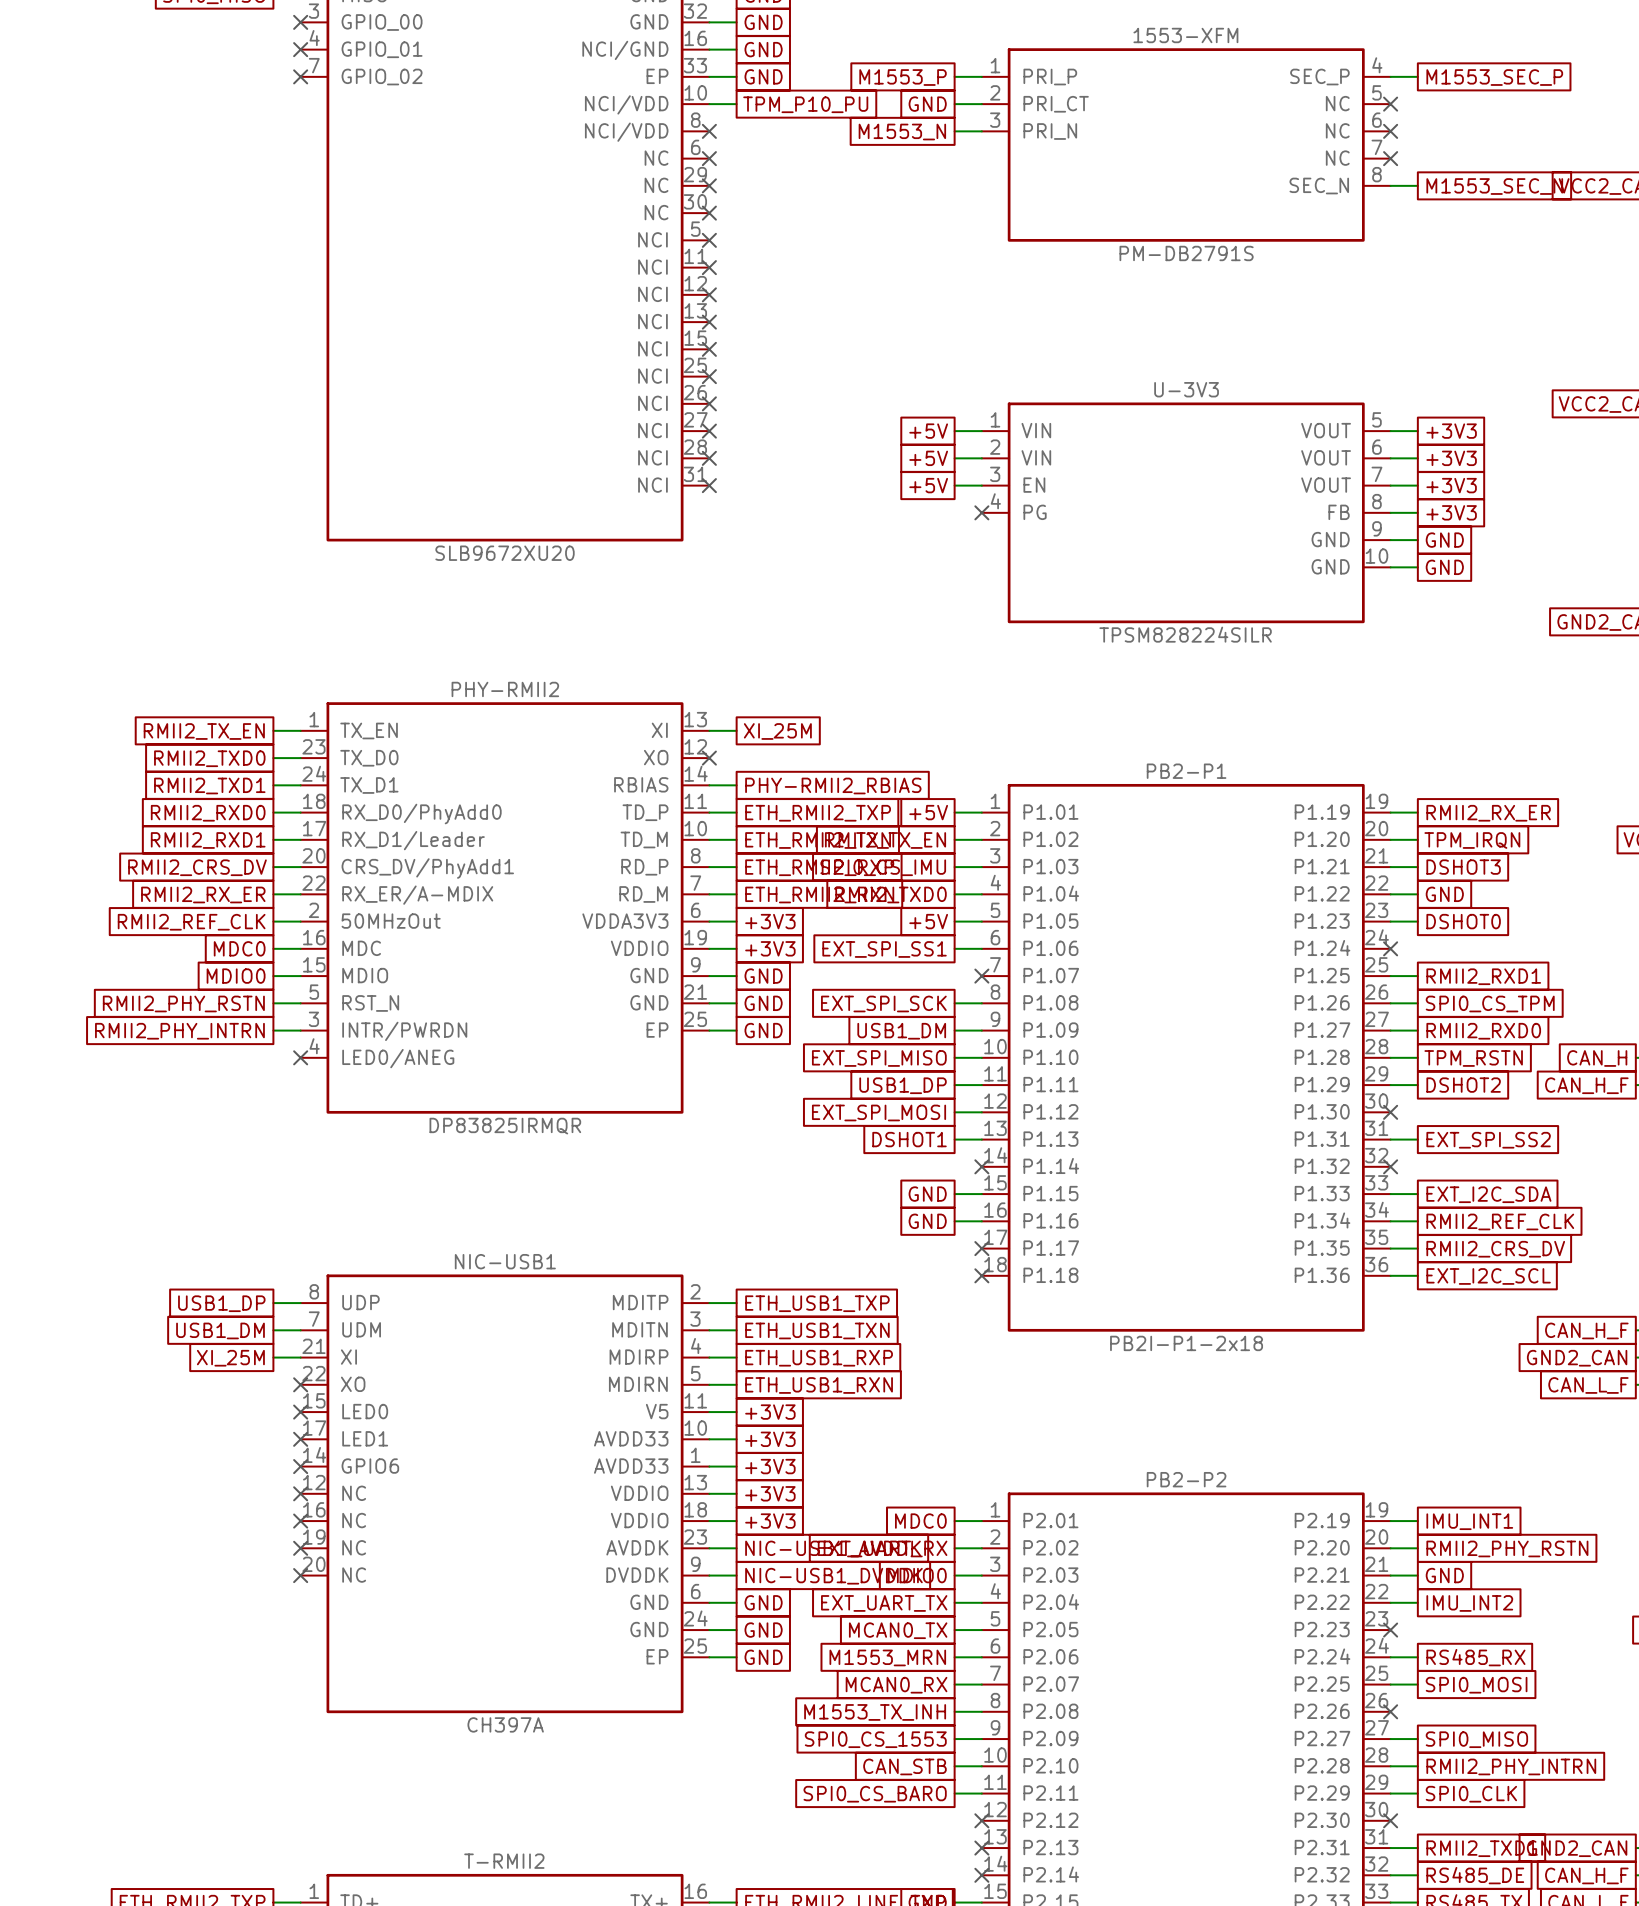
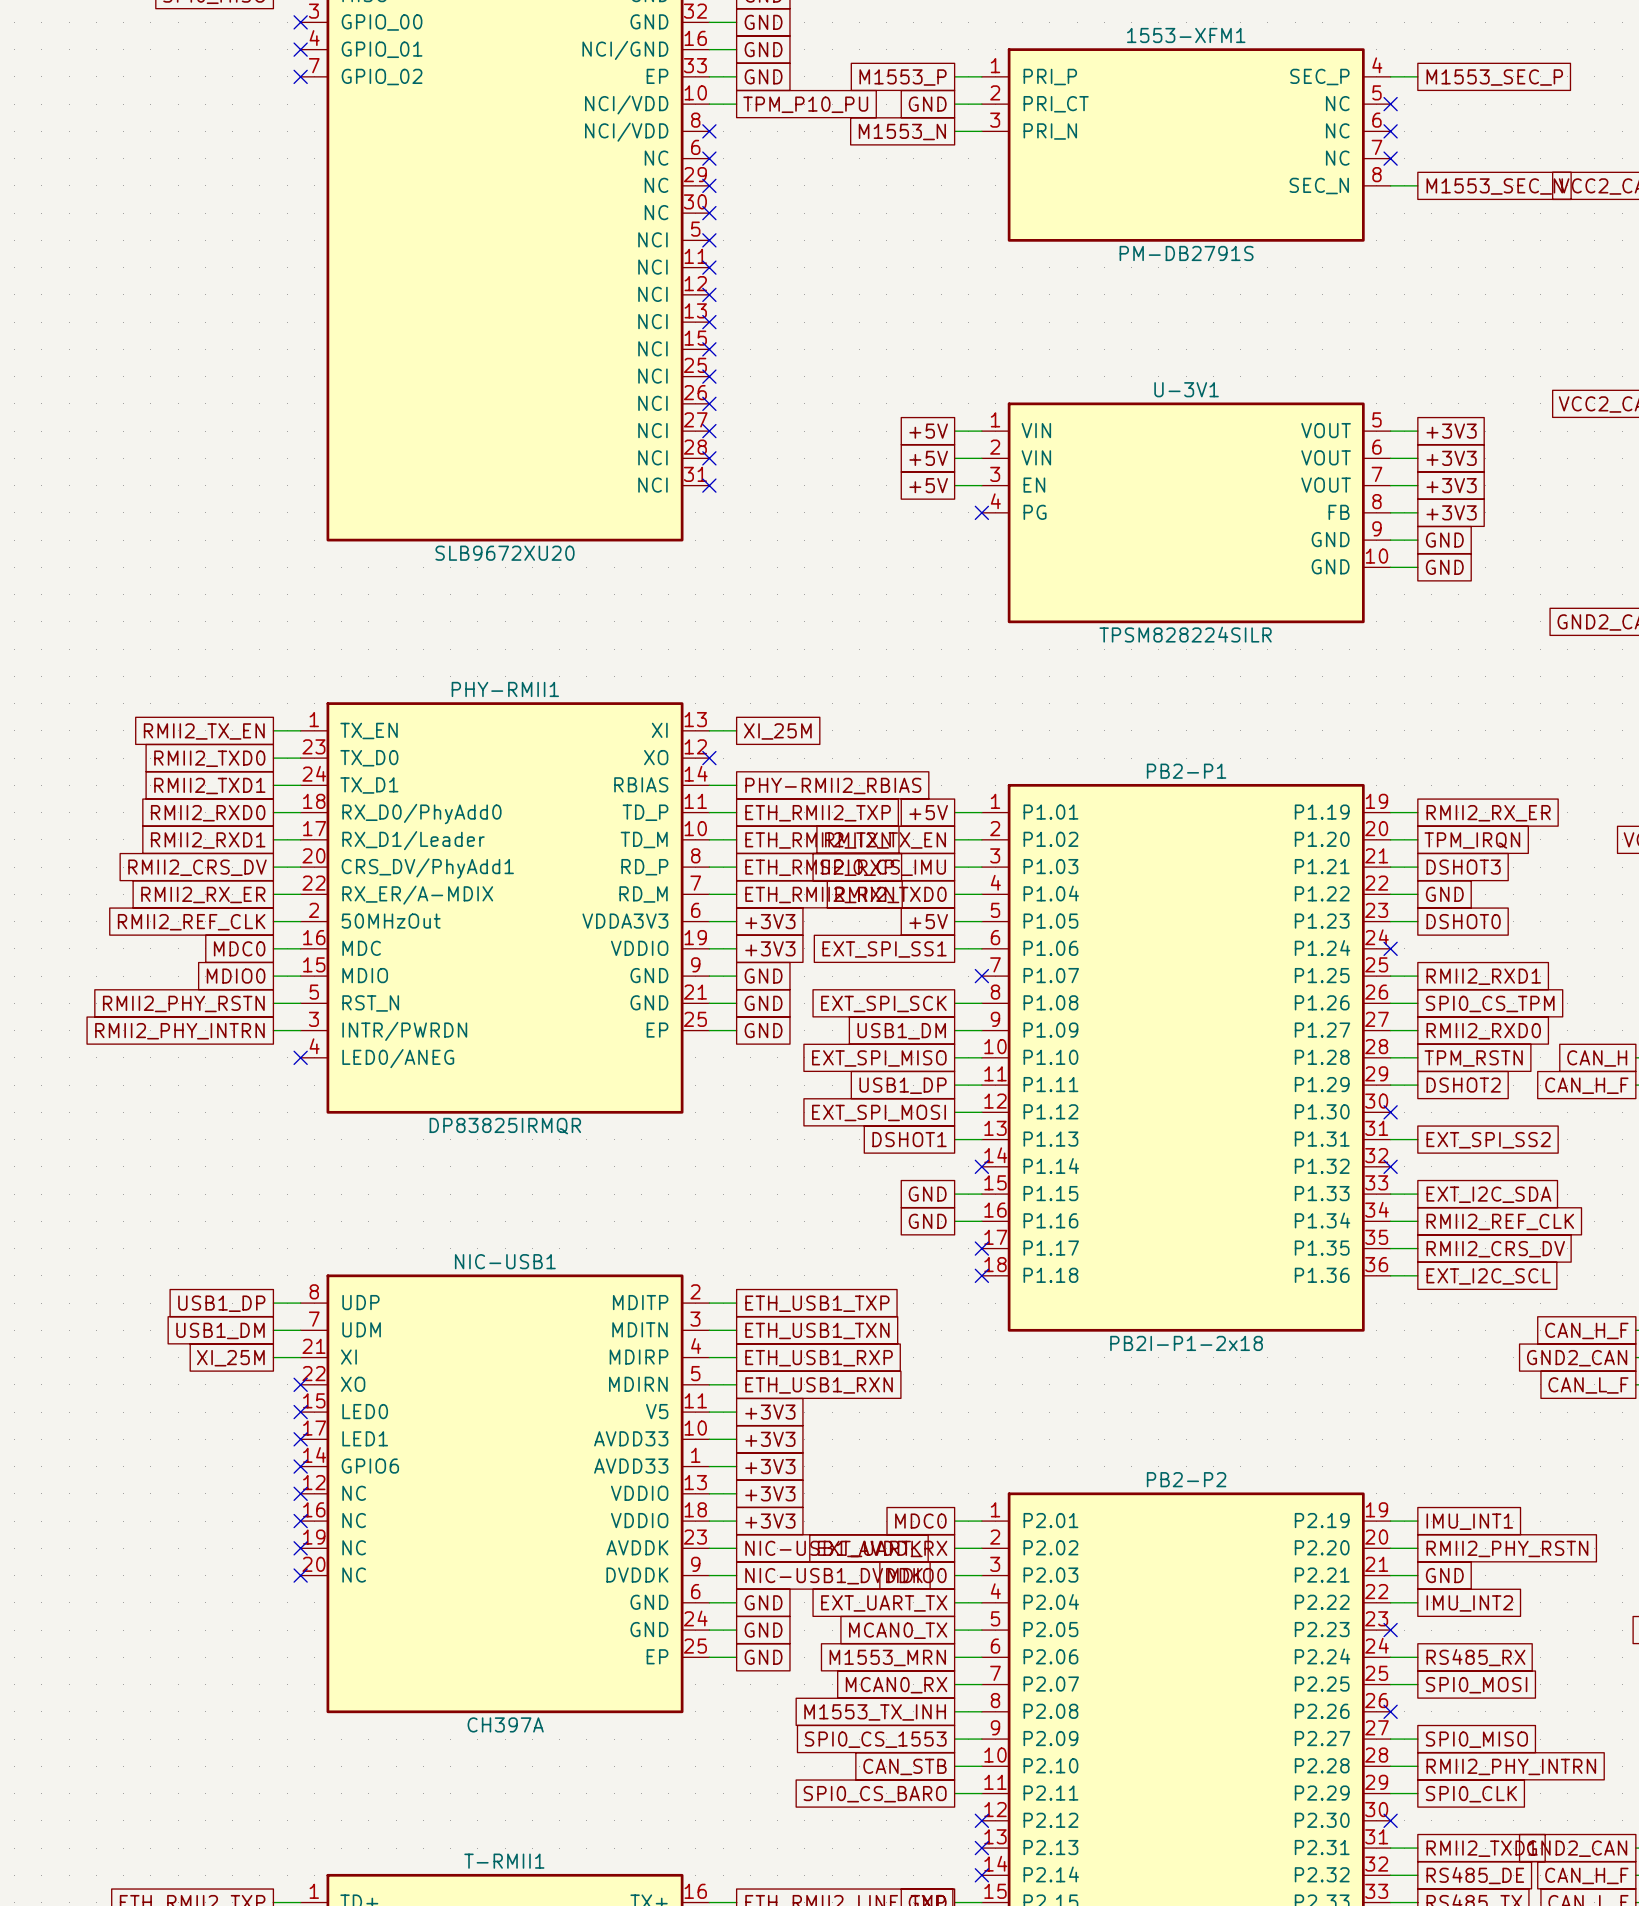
1553-XFM name: 1553-XFM (1185, 35) -> 1553-XFM1 (1186, 35)
U-3V3 name: U-3V3 (1186, 389) -> U-3V1 (1186, 389)
PHY-RMII2 name: PHY-RMII2 (505, 689) -> PHY-RMII1 (505, 689)
T-RMII2 name: T-RMII2 (504, 1861) -> T-RMII1 (504, 1861)

